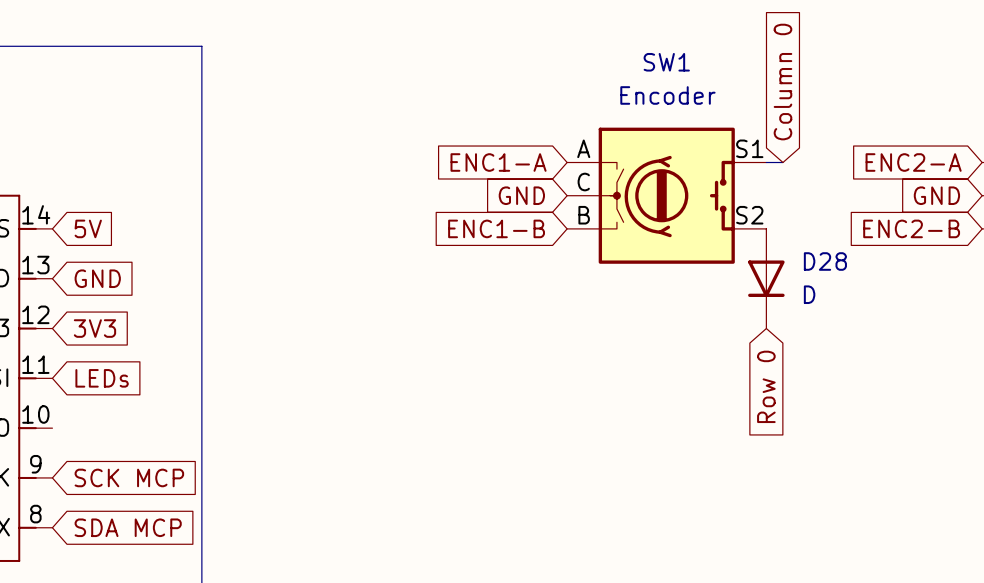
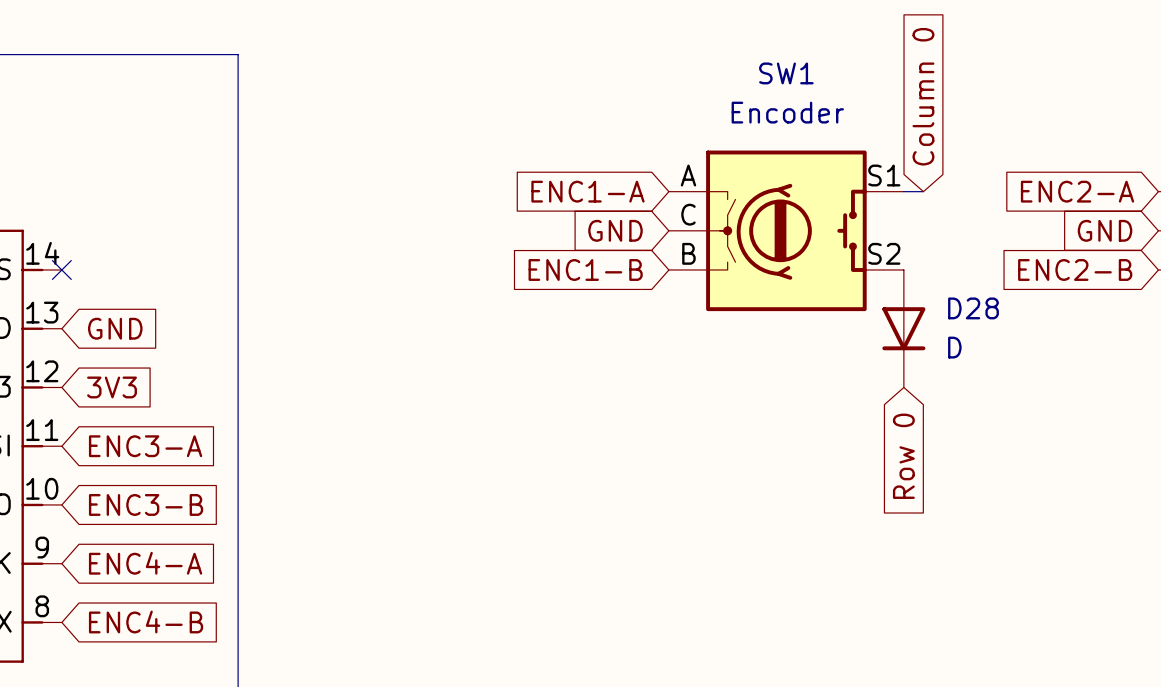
no-connect mark: none -> (61, 269)
global label: 5V (88, 228) -> none
global label: LEDs (102, 378) -> ENC3-A (145, 446)
global label: none -> ENC3-B (146, 504)
global label: SCK MCP (129, 477) -> ENC4-A (145, 563)
global label: SDA MCP (128, 527) -> ENC4-B (146, 621)

